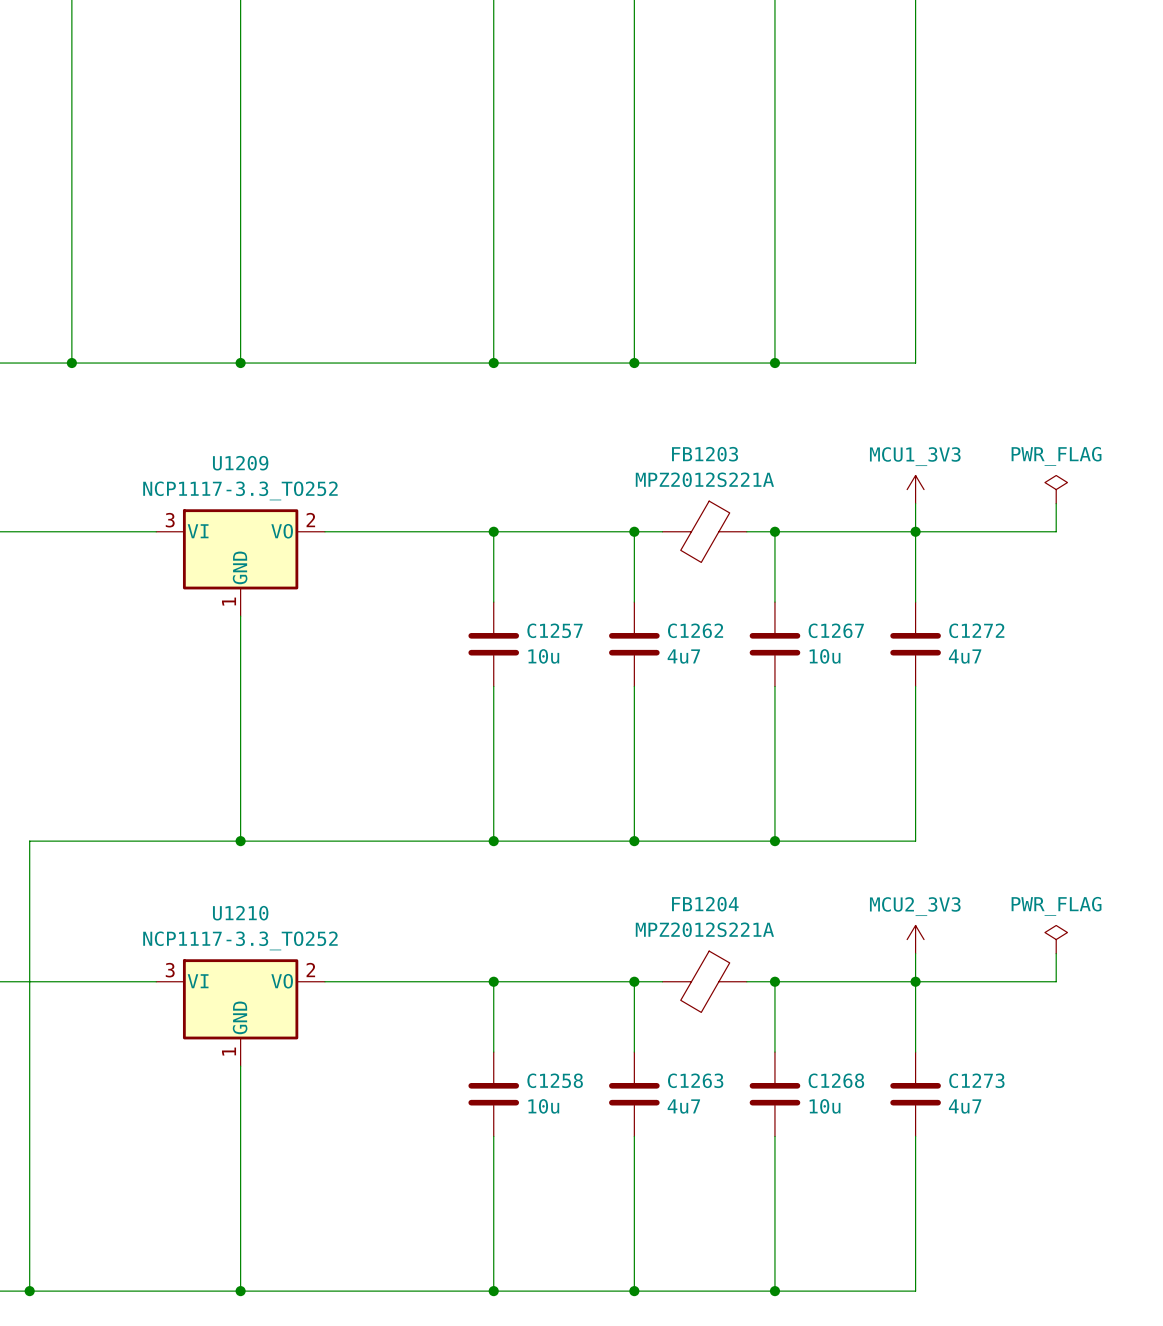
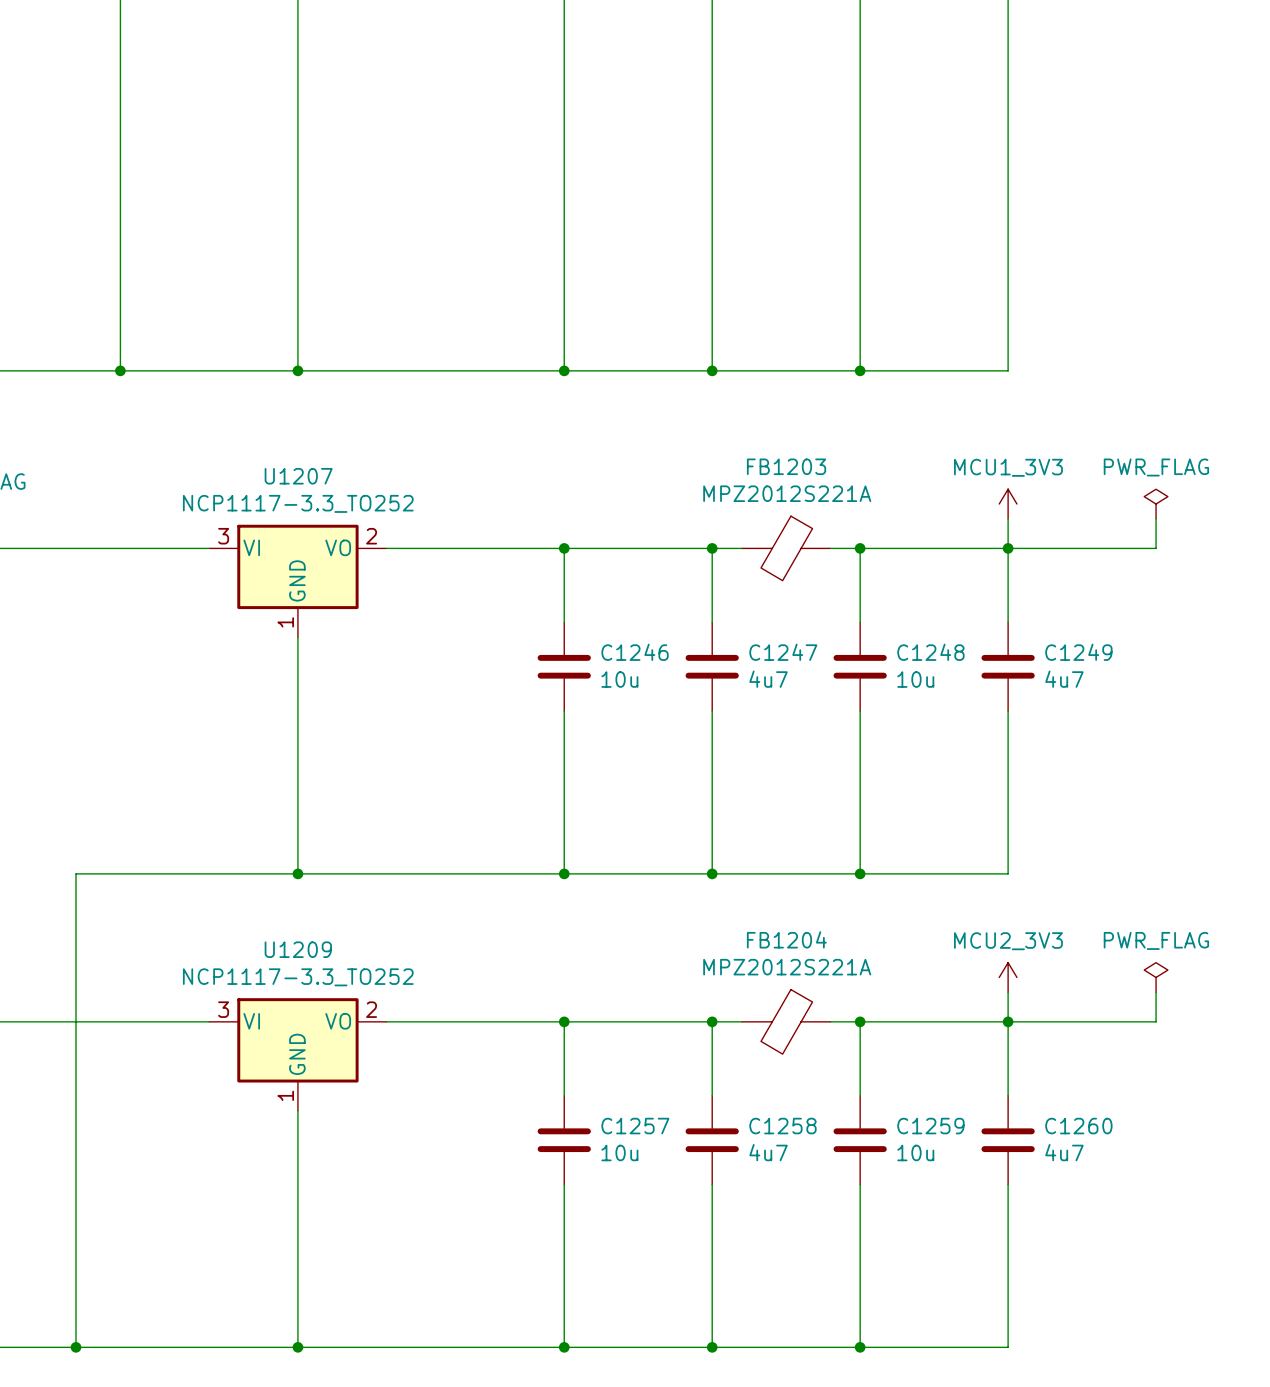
U1209 name: U1209 (240, 463) -> U1207 (298, 476)
C1257 name: C1257 (555, 630) -> C1246 (635, 652)
C1262 name: C1262 (695, 630) -> C1247 (783, 652)
C1267 name: C1267 (836, 630) -> C1248 (930, 652)
C1272 name: C1272 (976, 630) -> C1249 (1078, 652)
U1210 name: U1210 (240, 913) -> U1209 (298, 949)
C1258 name: C1258 (555, 1080) -> C1257 (635, 1126)
C1263 name: C1263 (695, 1080) -> C1258 (782, 1126)
C1268 name: C1268 (836, 1080) -> C1259 (930, 1126)
C1273 name: C1273 (976, 1080) -> C1260 (1078, 1126)

